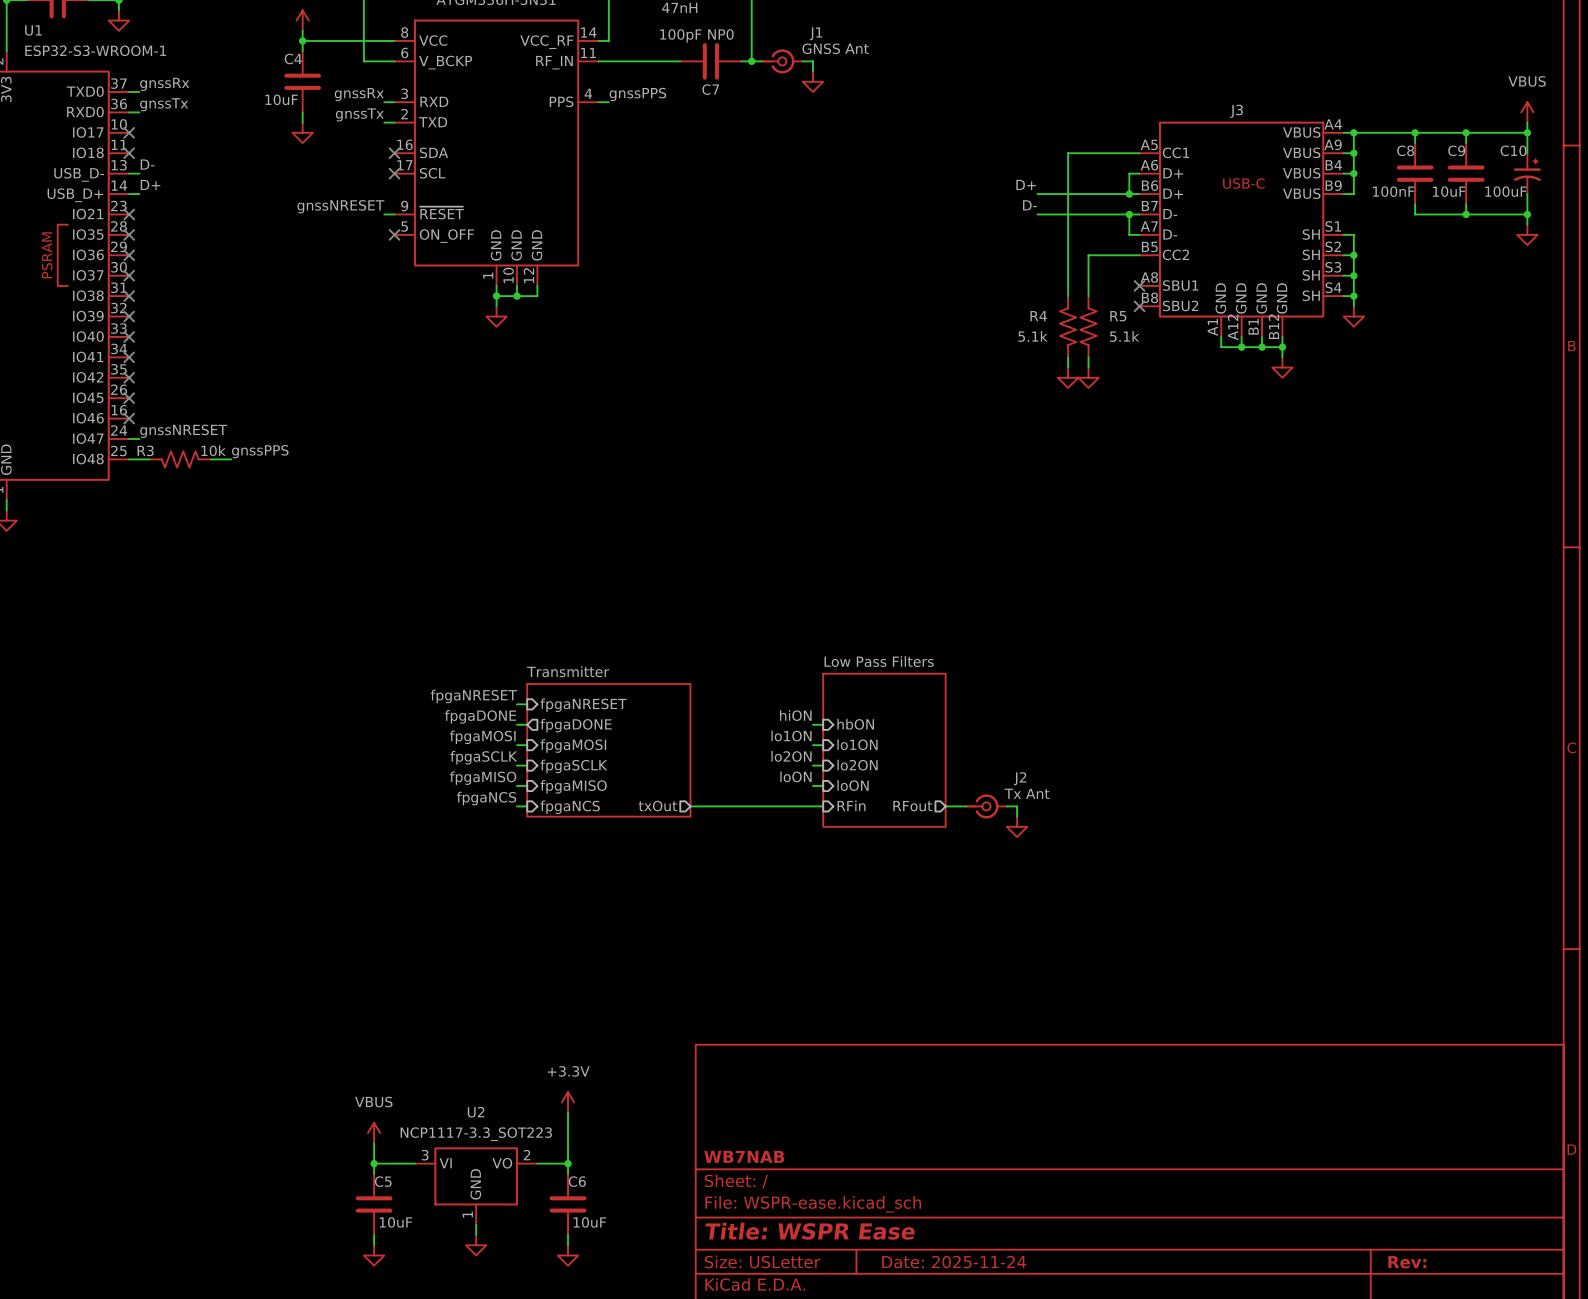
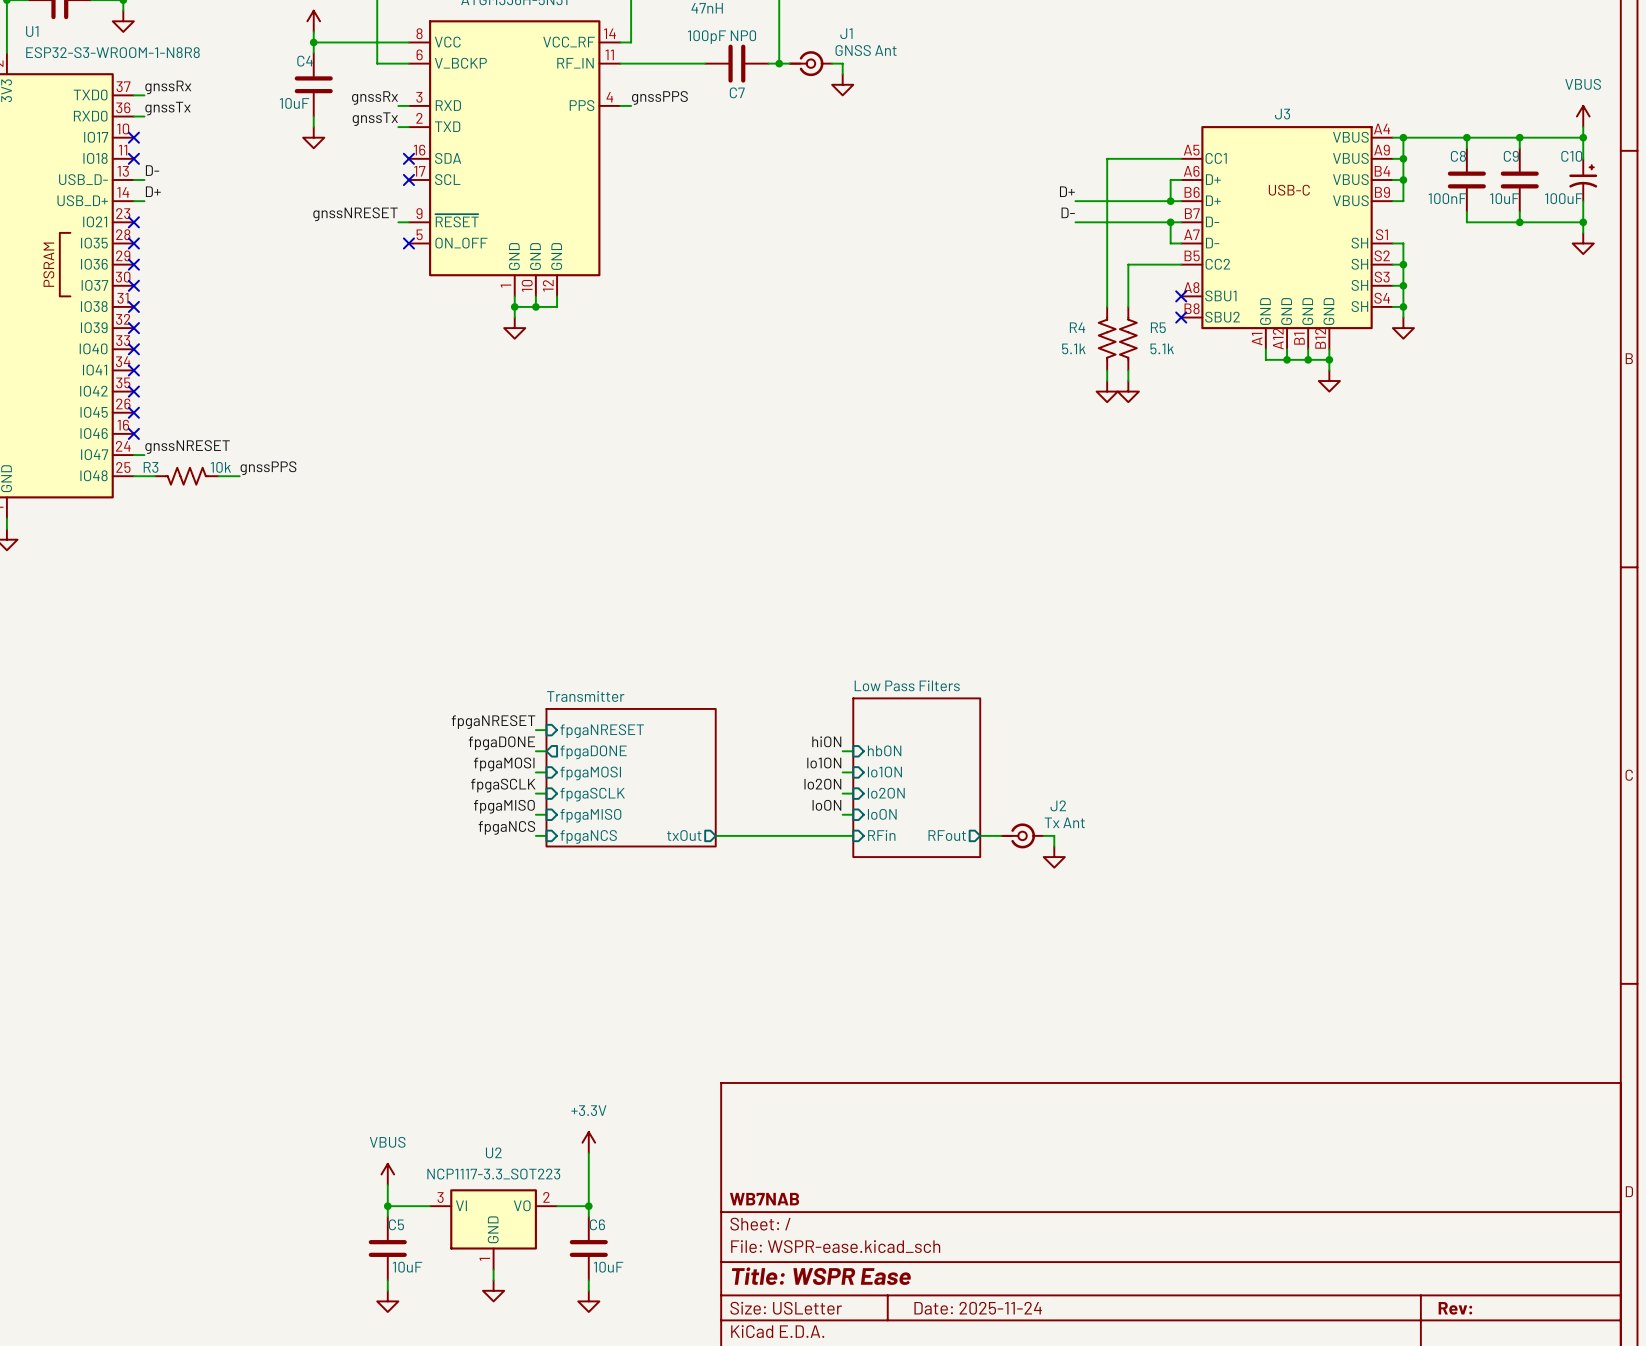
U1 value: ESP32-S3-WROOM-1 (95, 50) -> ESP32-S3-WROOM-1-N8R8 (112, 52)

